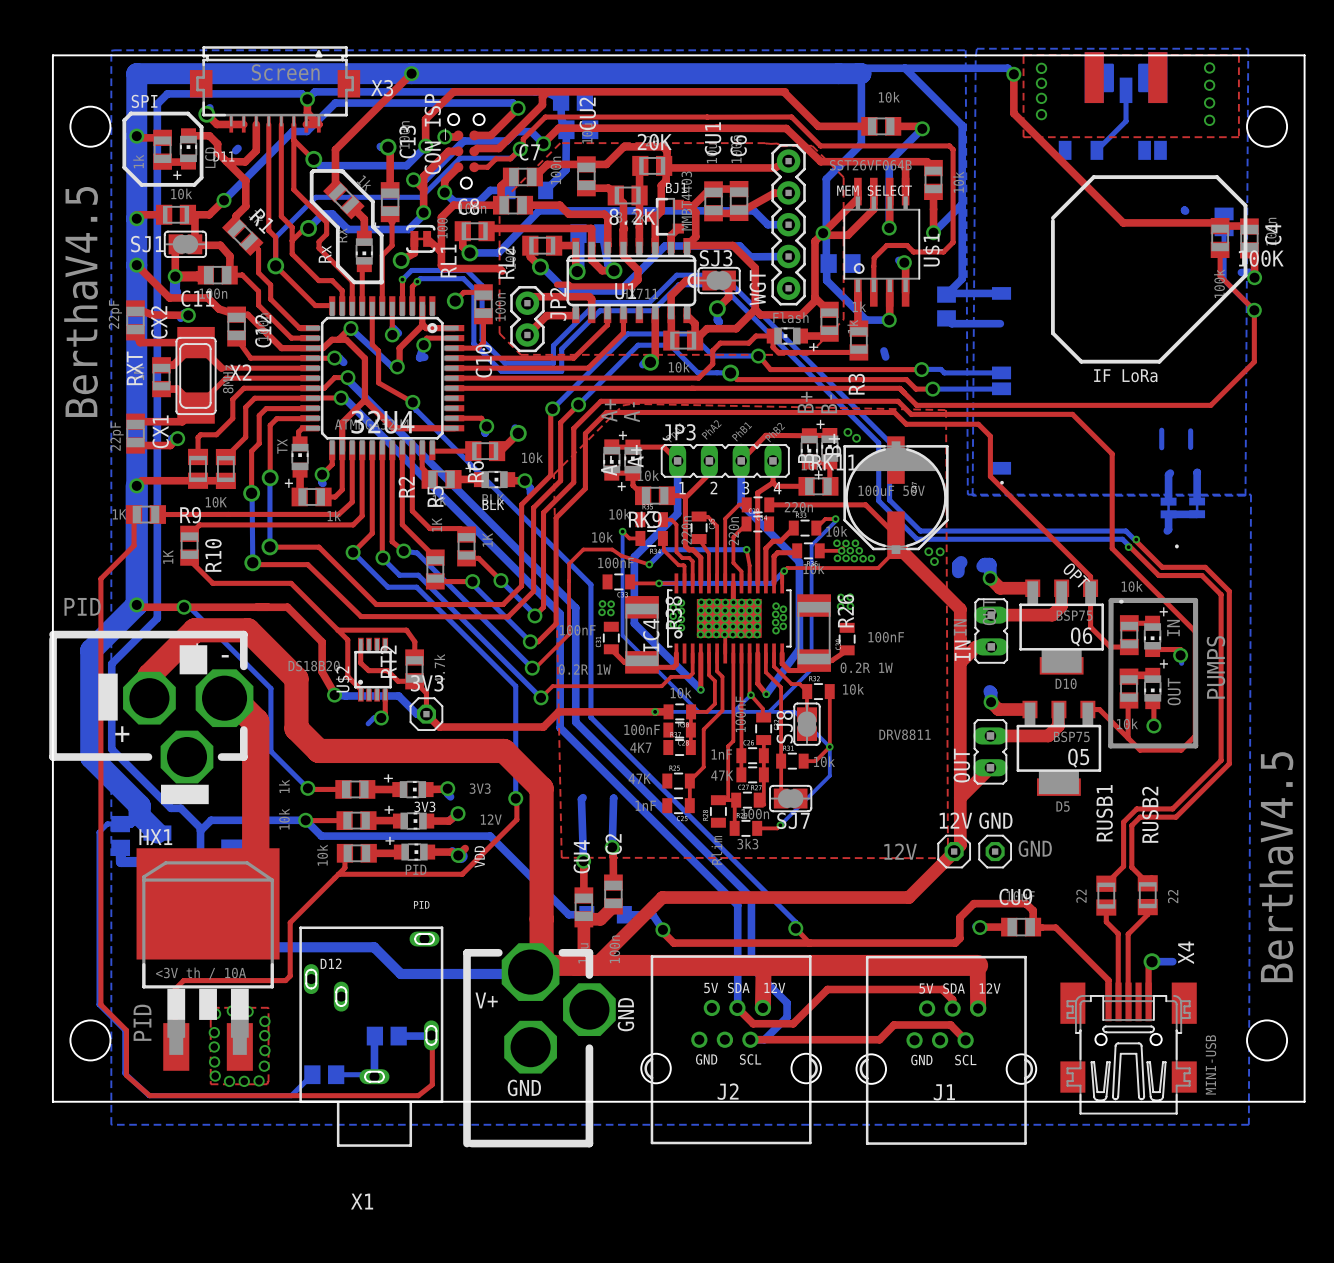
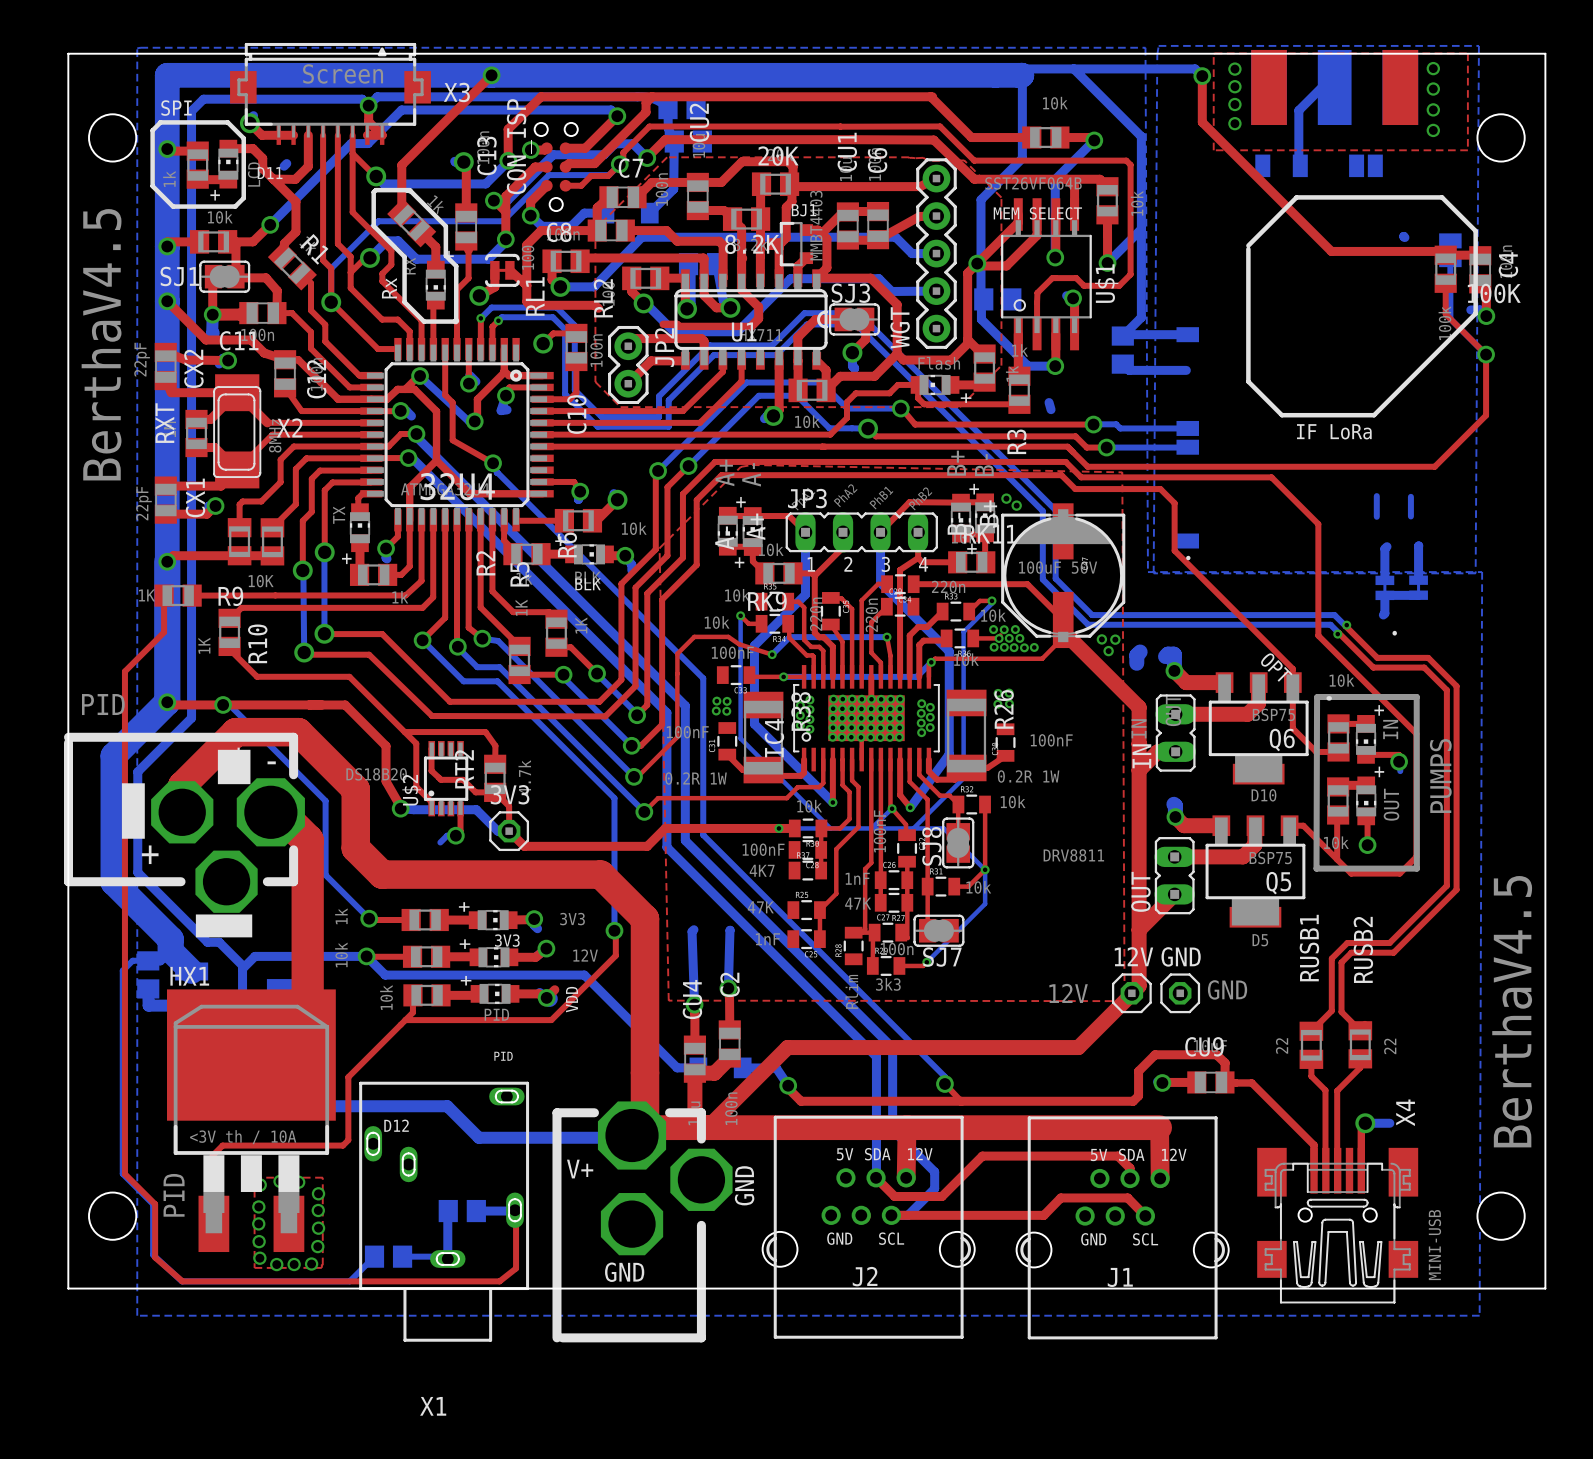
part footprint: [1084, 52, 1168, 104] -> [1251, 49, 1419, 126]
bottom track: none -> (1334, 87) (1322, 86) (1298, 110) (1298, 164)
bottom track: (1126, 90) (1126, 121) (1096, 150) -> none

